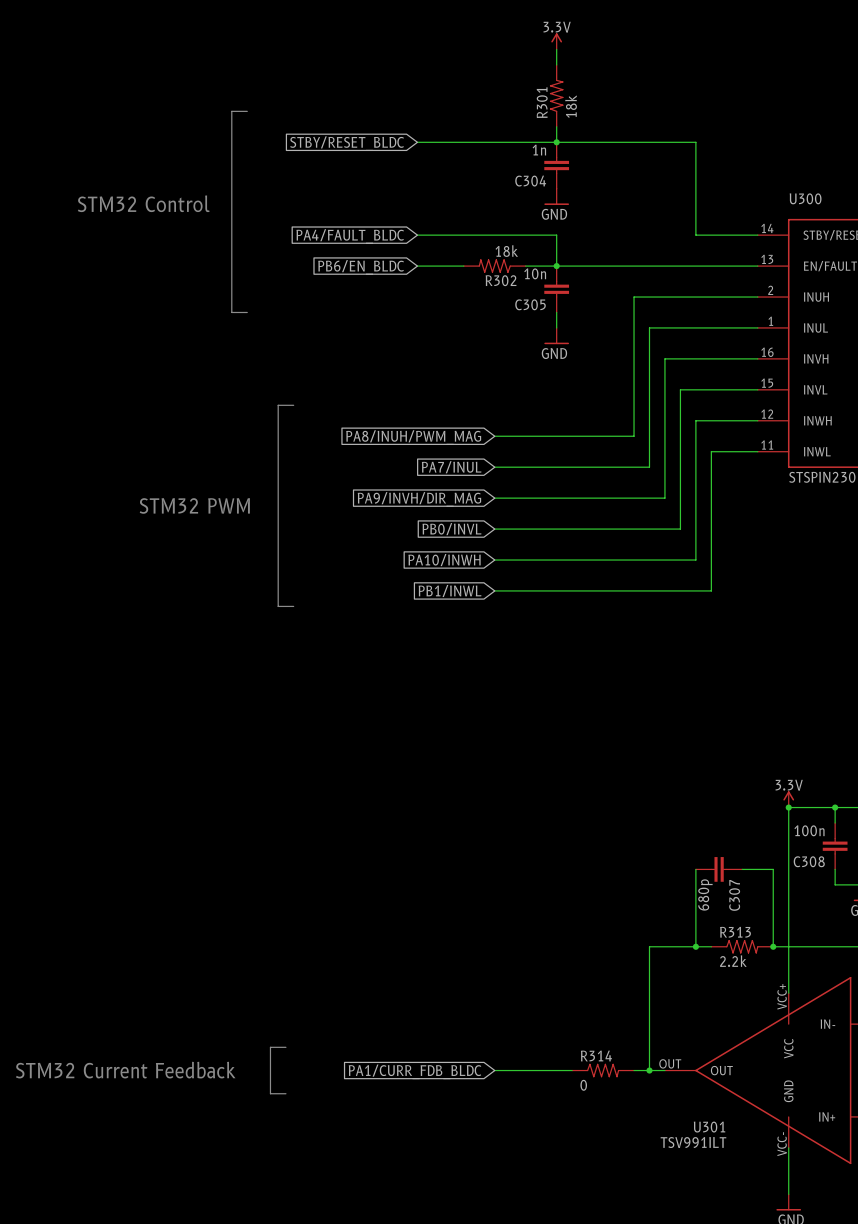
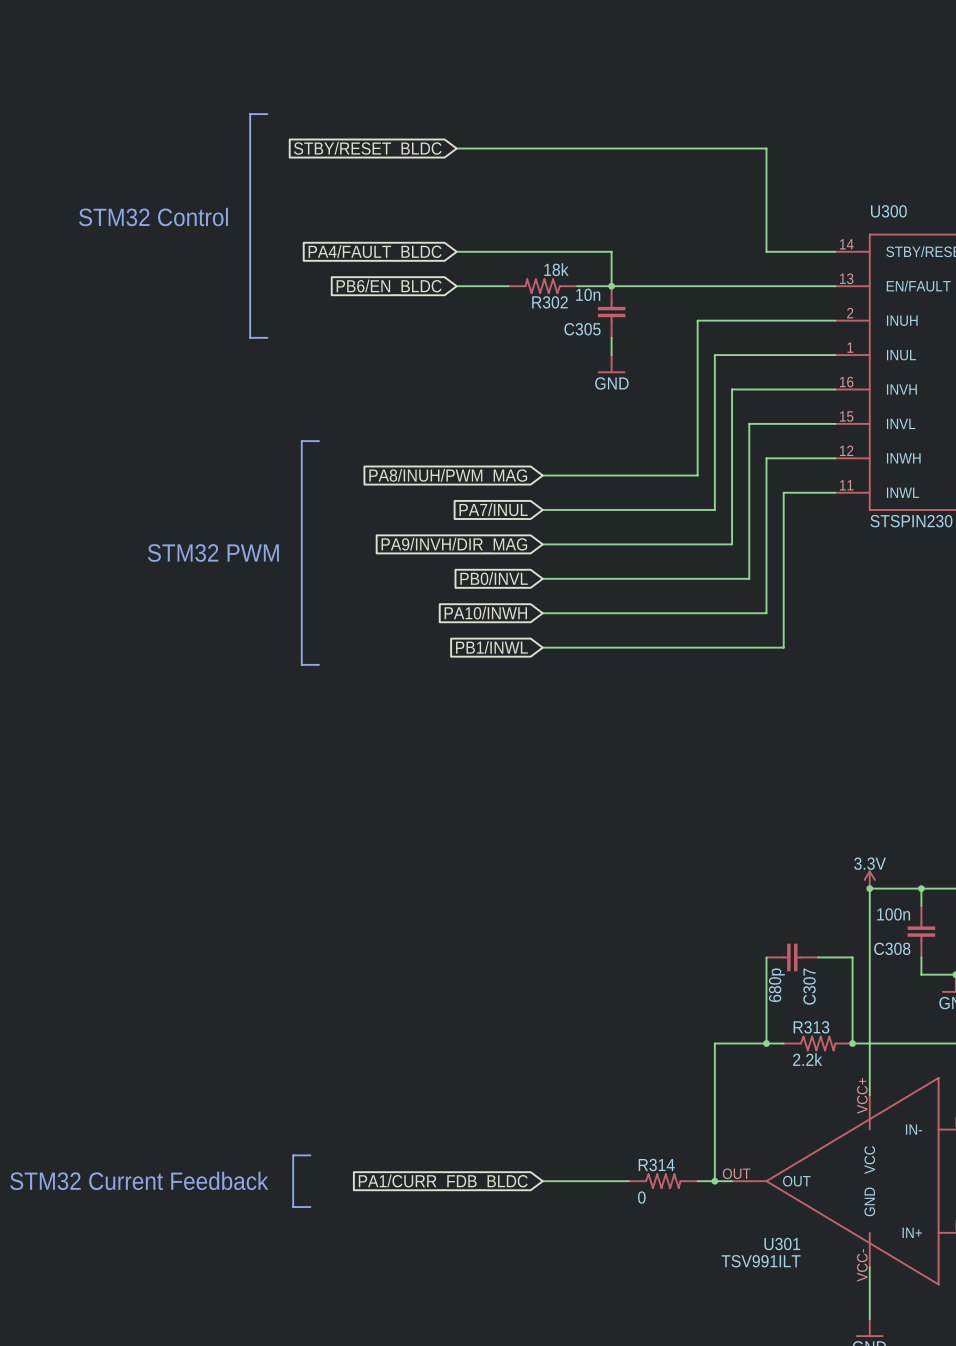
power symbol: 3.3V (556, 41) -> none
wire: (556, 49) (556, 64) -> none
R301: 18k (556, 95) -> none
wire: (556, 126) (556, 142) -> none
junction: (556, 142) -> none
C304: 1n (556, 165) -> none
power symbol: GND (556, 196) -> none

